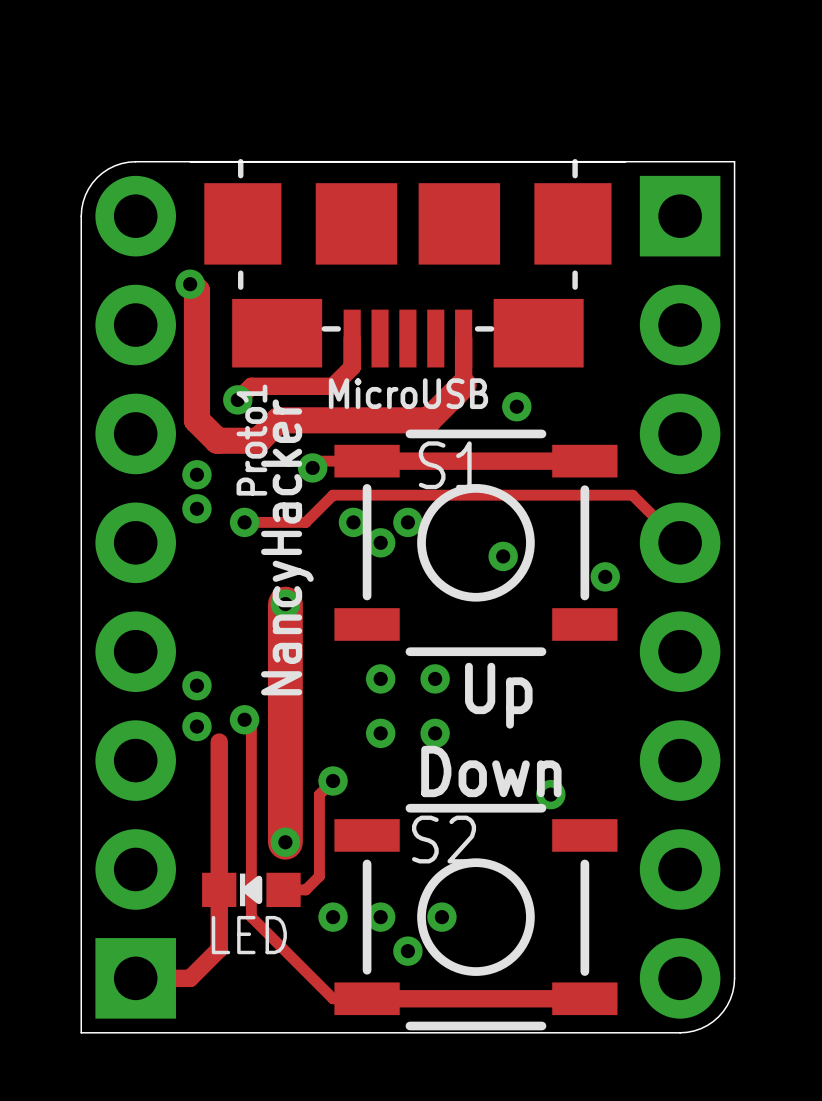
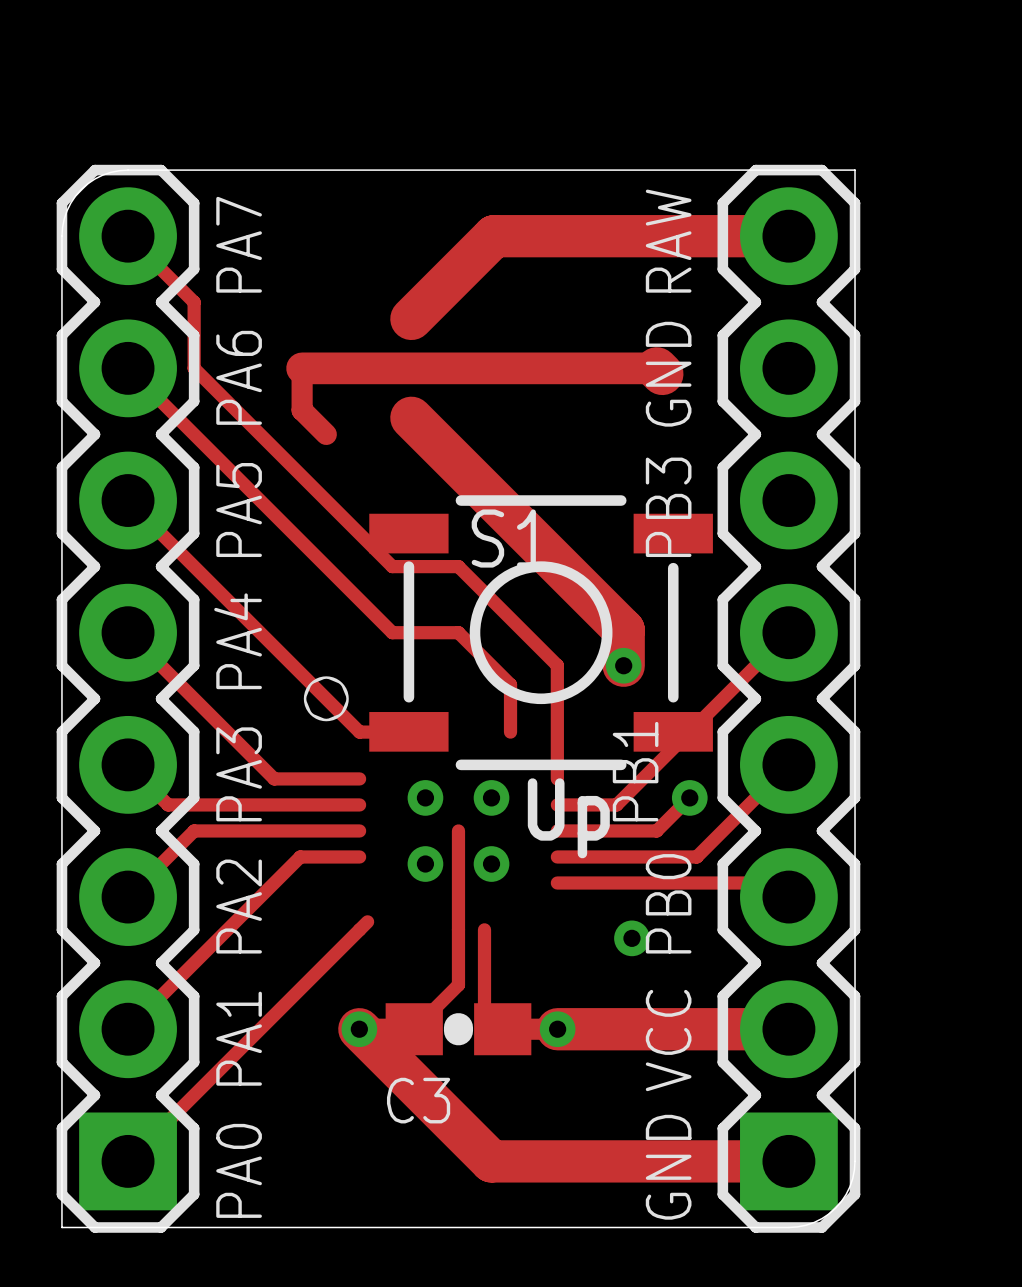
track: none -> (128, 236) (194, 302) (194, 368) (392, 566) (458, 566) (557, 665) (557, 778)
track: none -> (788, 236) (494, 236) (411, 318)
text: none -> RAW (668, 241)
text: none -> PA7 (239, 244)
part: (407, 263) -> none
track: (190, 284) (196, 291) (196, 420) (217, 440) (258, 440) (278, 420) (428, 420) (463, 385) (463, 338) -> none
via: (190, 284) -> none
track: none -> (128, 368) (392, 632) (458, 632) (510, 684) (510, 732)
track: none -> (662, 373) (656, 368) (302, 368) (302, 410) (326, 434)
text: none -> GND (668, 374)
text: none -> PA6 (239, 377)
track: (352, 338) (352, 367) (333, 386) (251, 386) (237, 399) -> none
track: none -> (411, 417) (623, 630) (623, 665)
text: MicroUSB (408, 393) -> none
via: (237, 399) -> none
via: (516, 406) -> none
track: none -> (128, 500) (359, 732) (406, 732)
text: none -> PB3 (668, 507)
text: Proto1 (251, 440) -> PA5 (239, 510)
track: (584, 461) (319, 461) (312, 467) -> none
via: (312, 467) -> none
via: (196, 474) -> none
via: (196, 508) -> none
track: (244, 522) (305, 522) (333, 495) (632, 495) (680, 542) -> (557, 804) (616, 804) (788, 632)
via: (244, 522) -> none
via: (353, 522) -> none
via: (407, 522) -> none
track: none -> (128, 632) (274, 778) (359, 778)
via: (380, 542) -> none
text: NancyHacker (287, 547) -> none
text: none -> PA4 (238, 641)
via: (503, 556) -> none
via: none -> (623, 665)
via: (605, 576) -> none
drawing: none -> [303, 676, 349, 722]
part side: bottom (135, 597) -> top (128, 698)
part side: bottom (680, 597) -> top (788, 698)
track: (285, 604) (285, 842) -> none
via: (285, 604) -> none
track: none -> (128, 764) (168, 804) (359, 804)
track: none -> (788, 764) (696, 856) (557, 856)
text: none -> PB1 (635, 771)
text: none -> PA3 (239, 774)
track: none -> (689, 797) (656, 830) (557, 830)
via: none -> (689, 797)
via: (196, 685) -> none
track: none -> (359, 830) (194, 830) (128, 897)
track: none -> (458, 830) (458, 984) (414, 1029) (359, 1029) (491, 1161) (788, 1161)
track: (244, 719) (251, 726) (251, 917) (333, 998) (584, 998) -> none
via: (244, 719) -> none
via: (196, 726) -> none
track: none -> (359, 856) (300, 856) (128, 1029)
track: (219, 742) (219, 949) (190, 978) (135, 978) -> (351, 938) (128, 1161)
track: none -> (557, 883) (774, 883) (788, 897)
text: none -> PB0 (668, 903)
text: none -> PA2 (239, 906)
via: (333, 781) -> none
track: none -> (484, 929) (484, 1011) (502, 1029) (788, 1029)
track: (319, 794) (319, 876) (305, 889) (283, 889) -> none
via: (285, 842) -> none
via: none -> (359, 1029)
C3: none -> (458, 1029)
via: none -> (557, 1029)
text: none -> PA1 (239, 1038)
text: none -> VCC (668, 1040)
LED: (251, 889) -> none
via: (333, 917) -> none
via: (380, 917) -> none
via: (441, 917) -> none
S2: Down (475, 917) -> none
via: (407, 951) -> none
text: none -> GND (668, 1167)
text: none -> PA0 (239, 1170)

